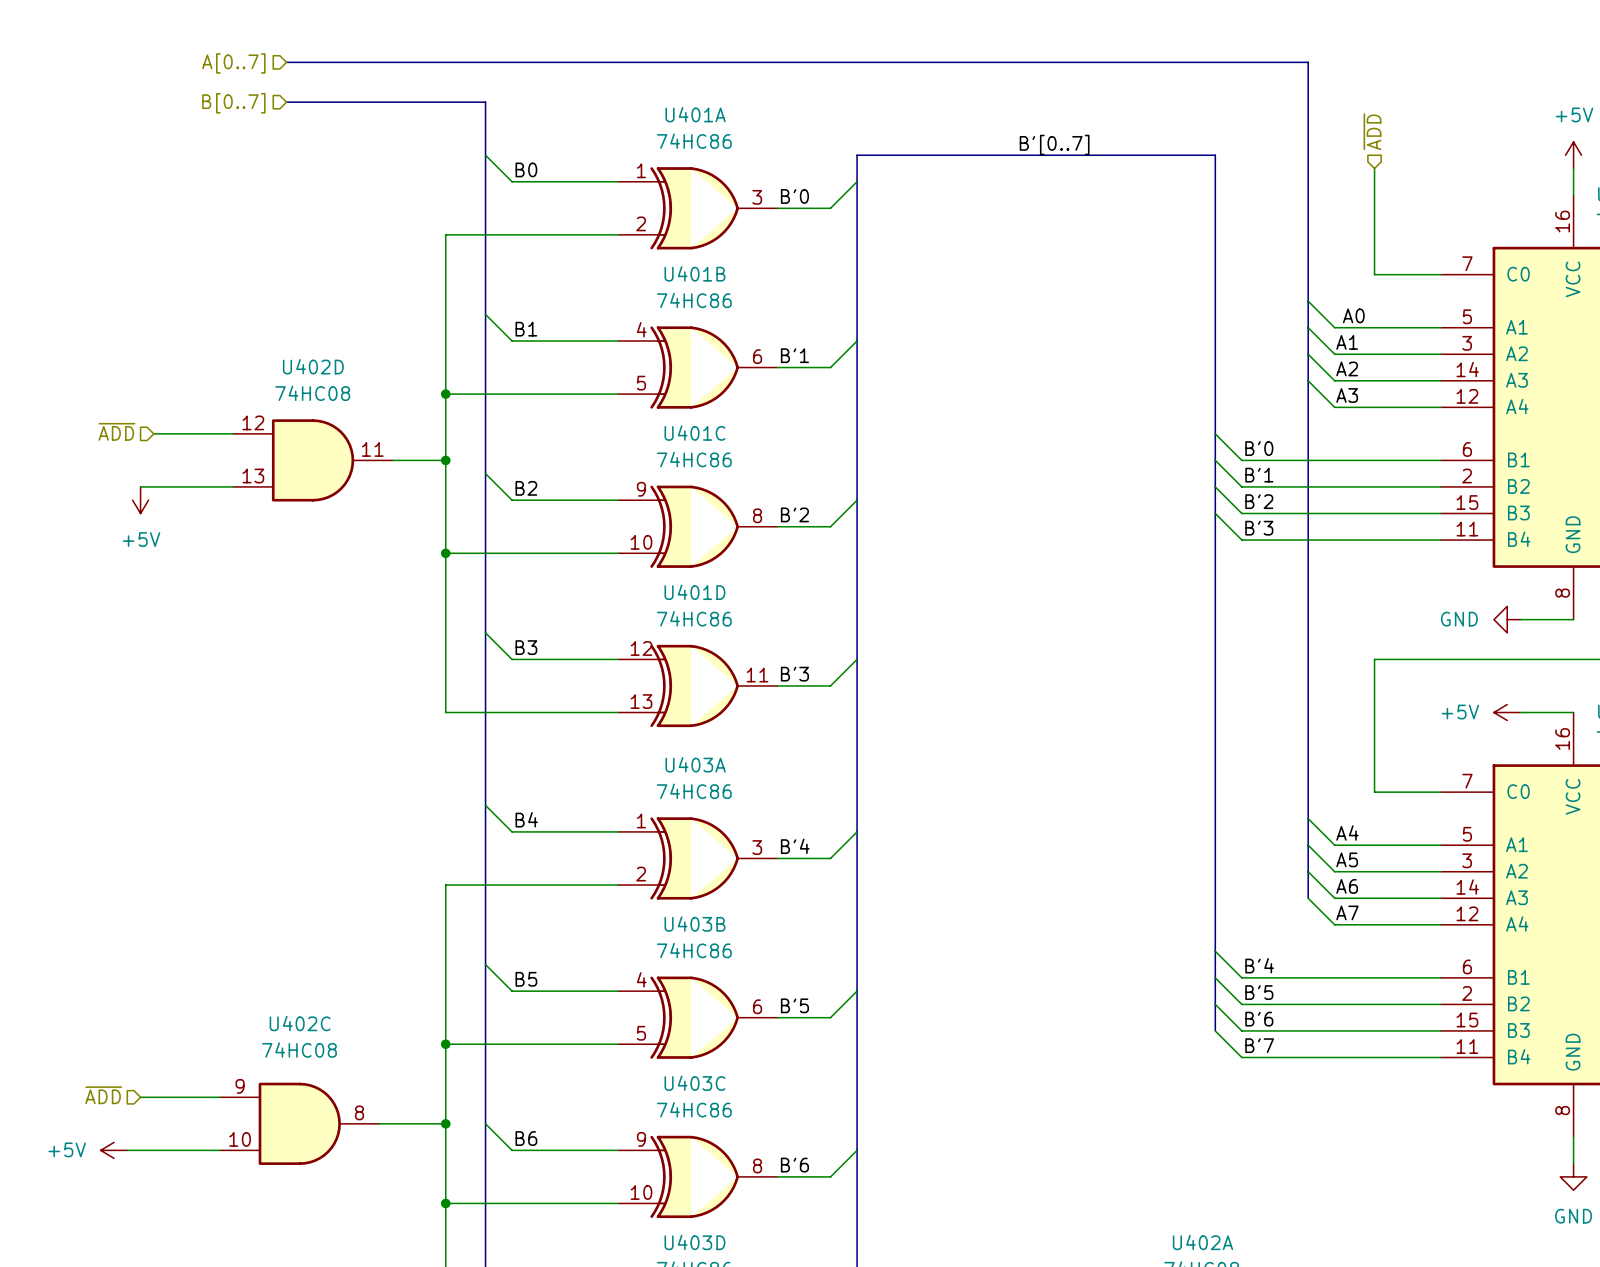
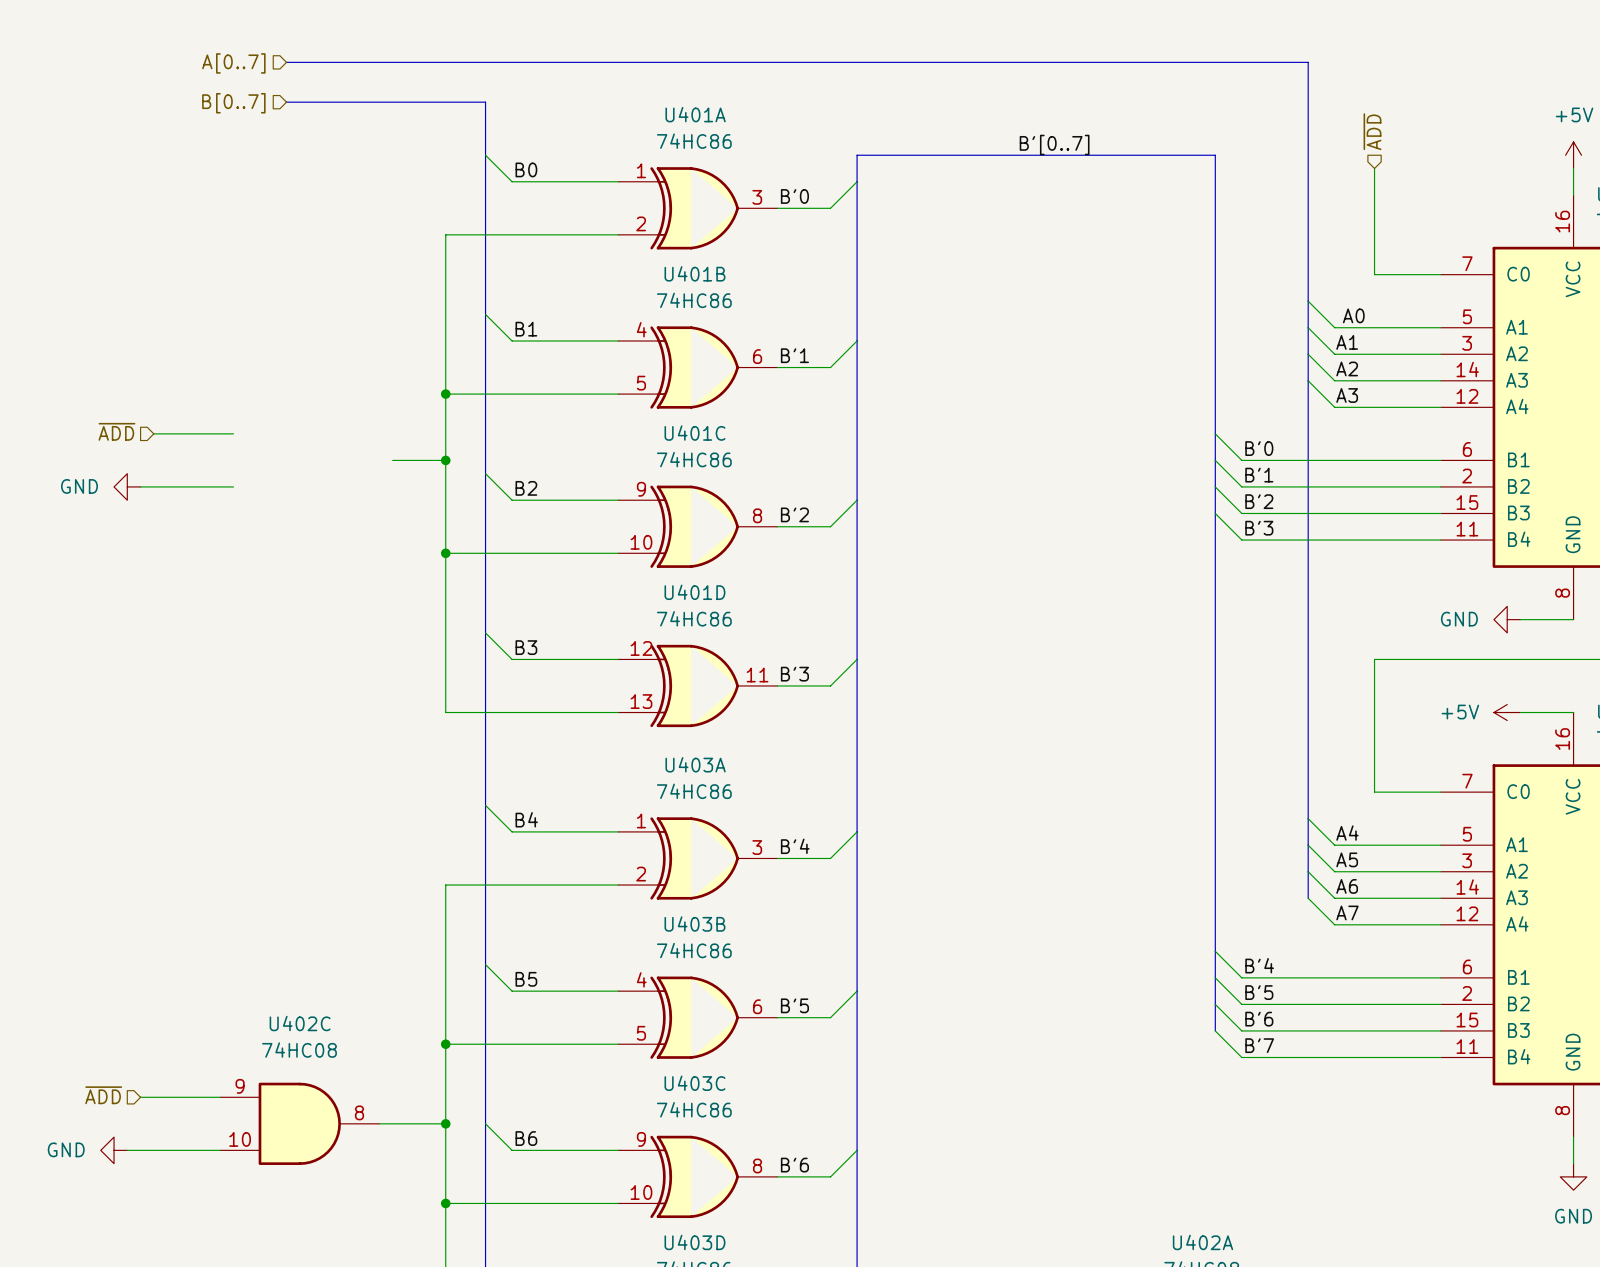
U402D: 74HC08 (313, 460) -> none
power symbol: none -> GND (127, 486)
power symbol: +5V (140, 500) -> none
power symbol: +5V (114, 1150) -> GND (114, 1150)

